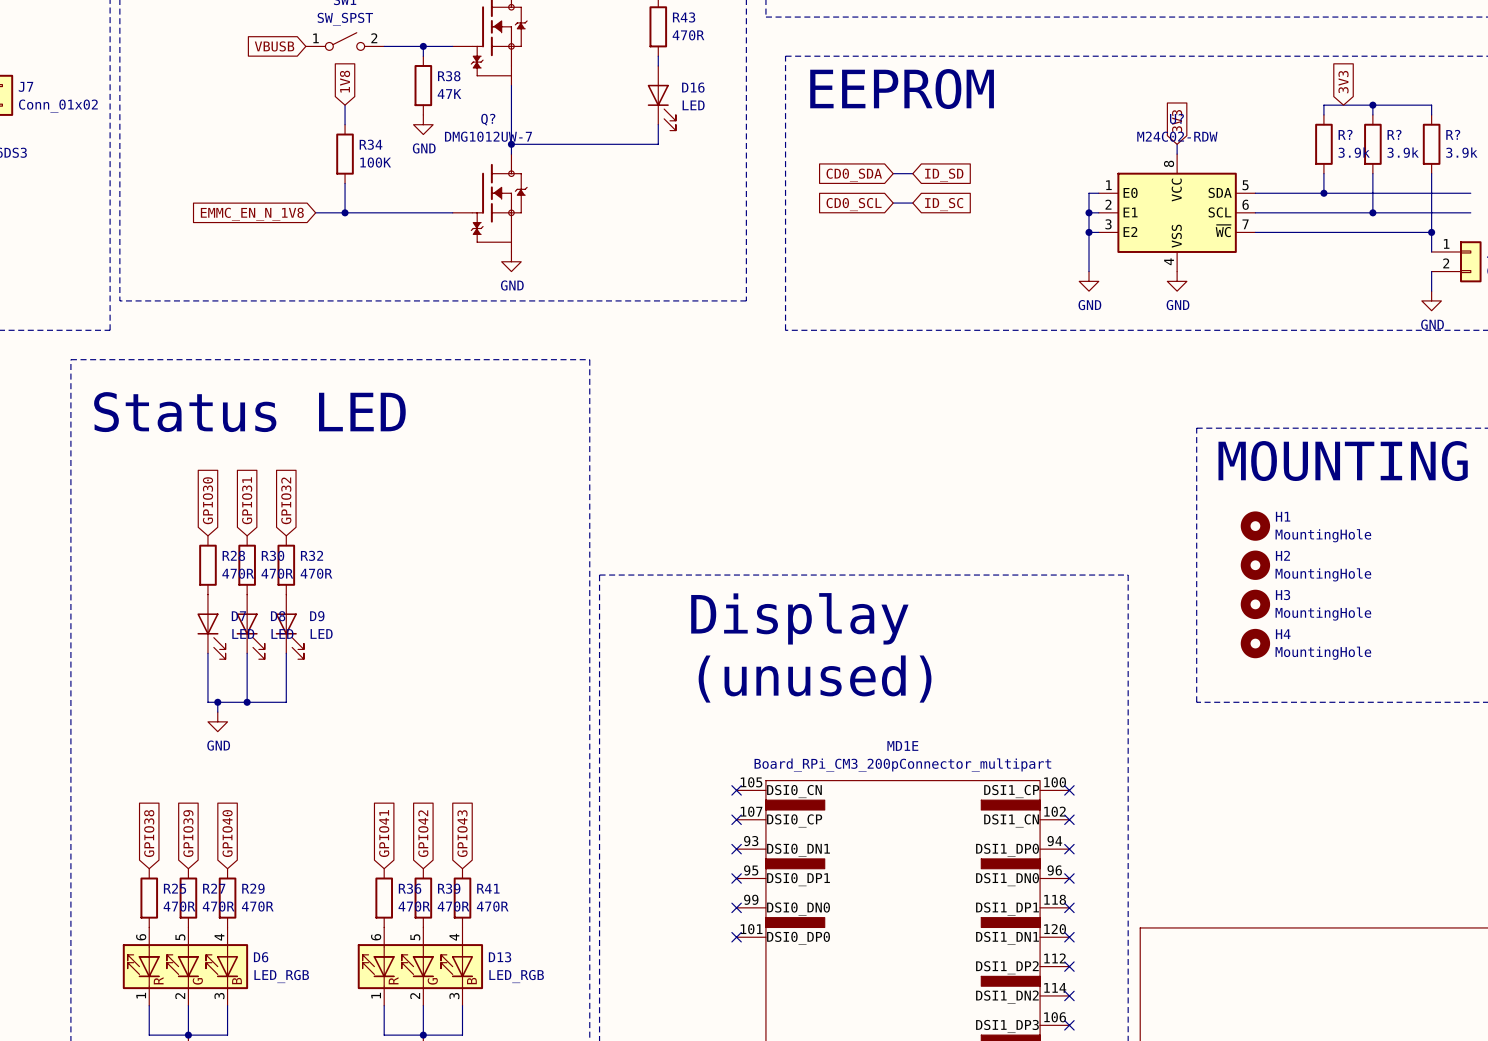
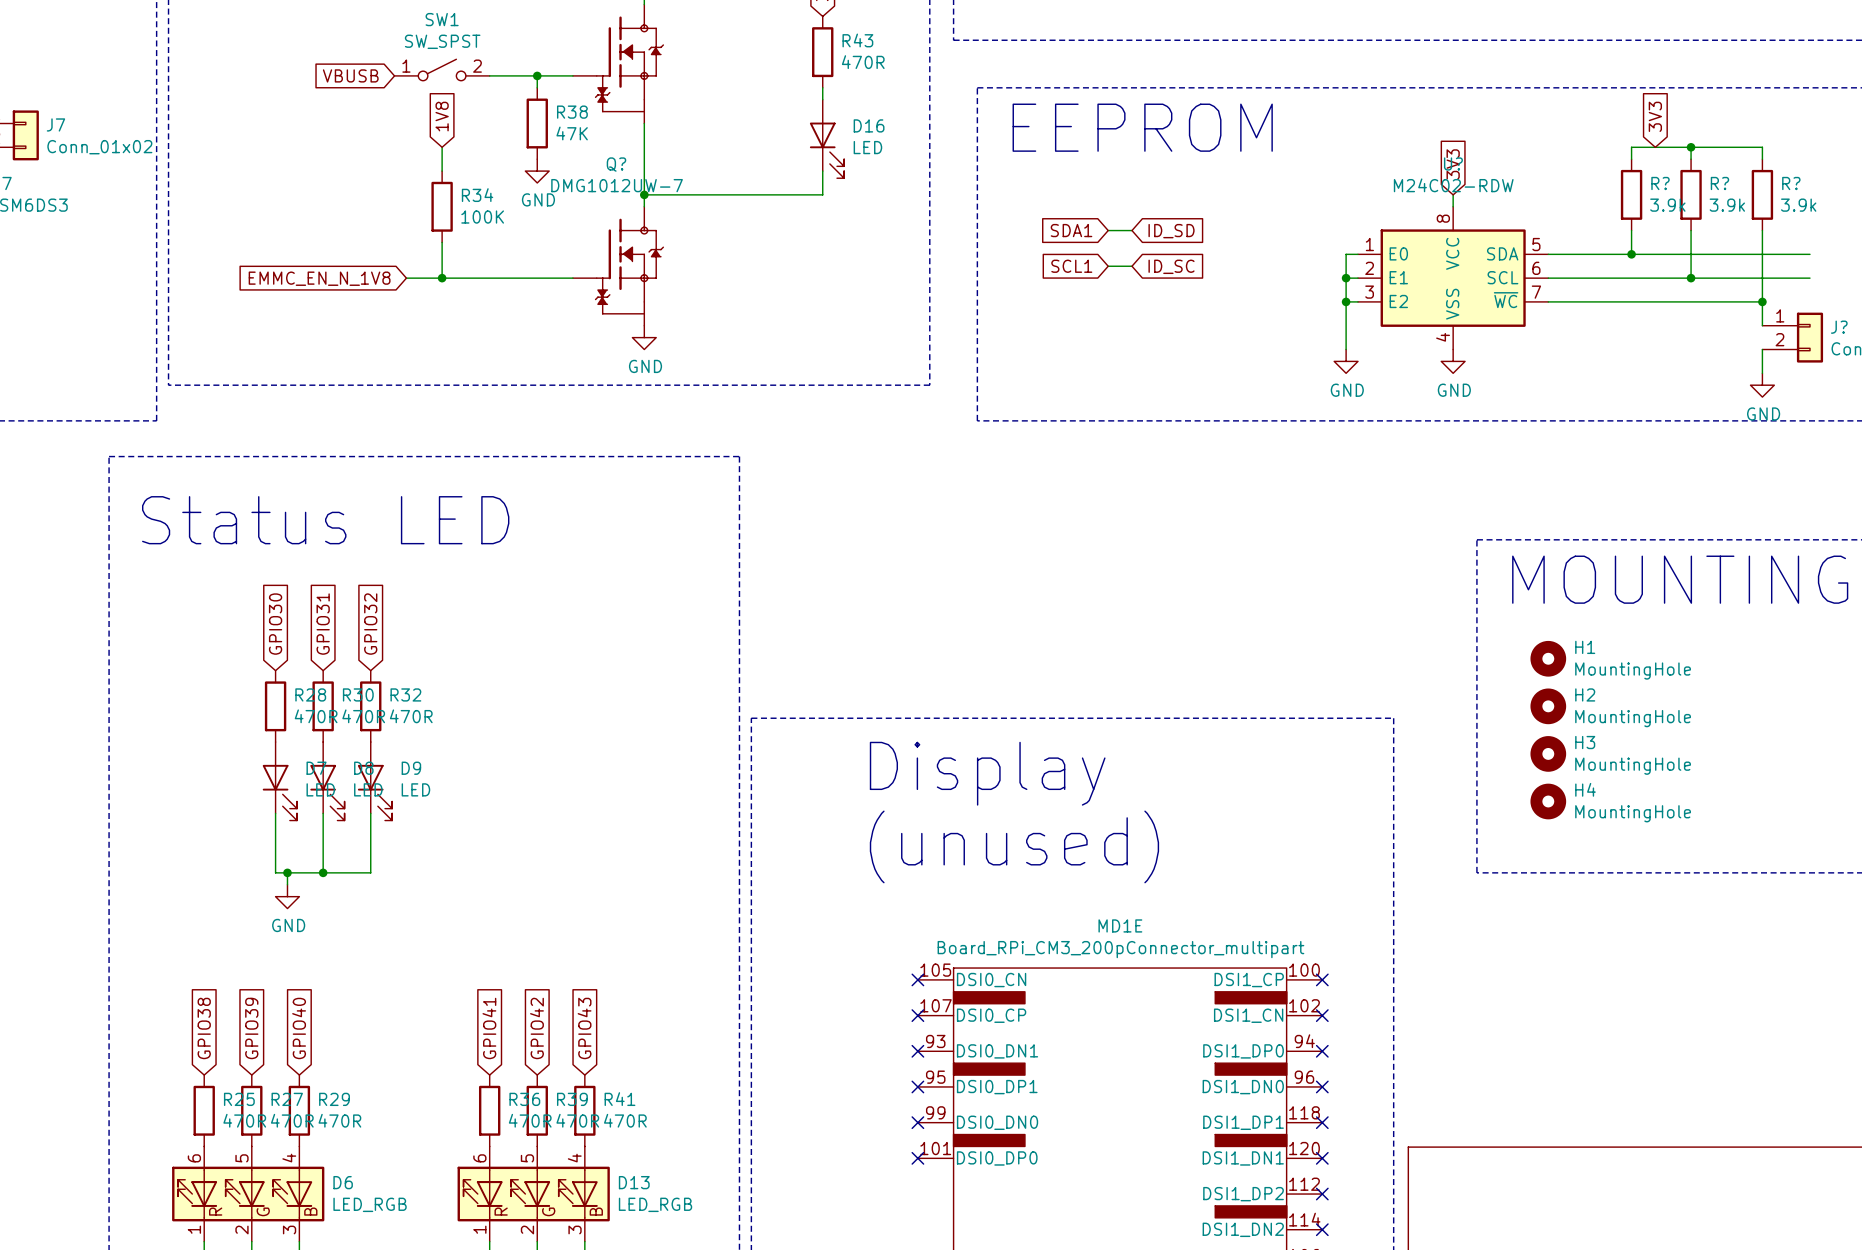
global label: CD0_SDA (854, 175) -> SDA1 (1071, 230)
global label: CD0_SCL (854, 204) -> SCL1 (1071, 266)

